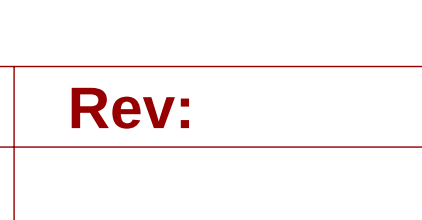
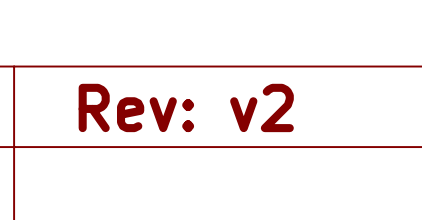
title block: Rev: (130, 108) -> Rev: v2 (186, 107)

